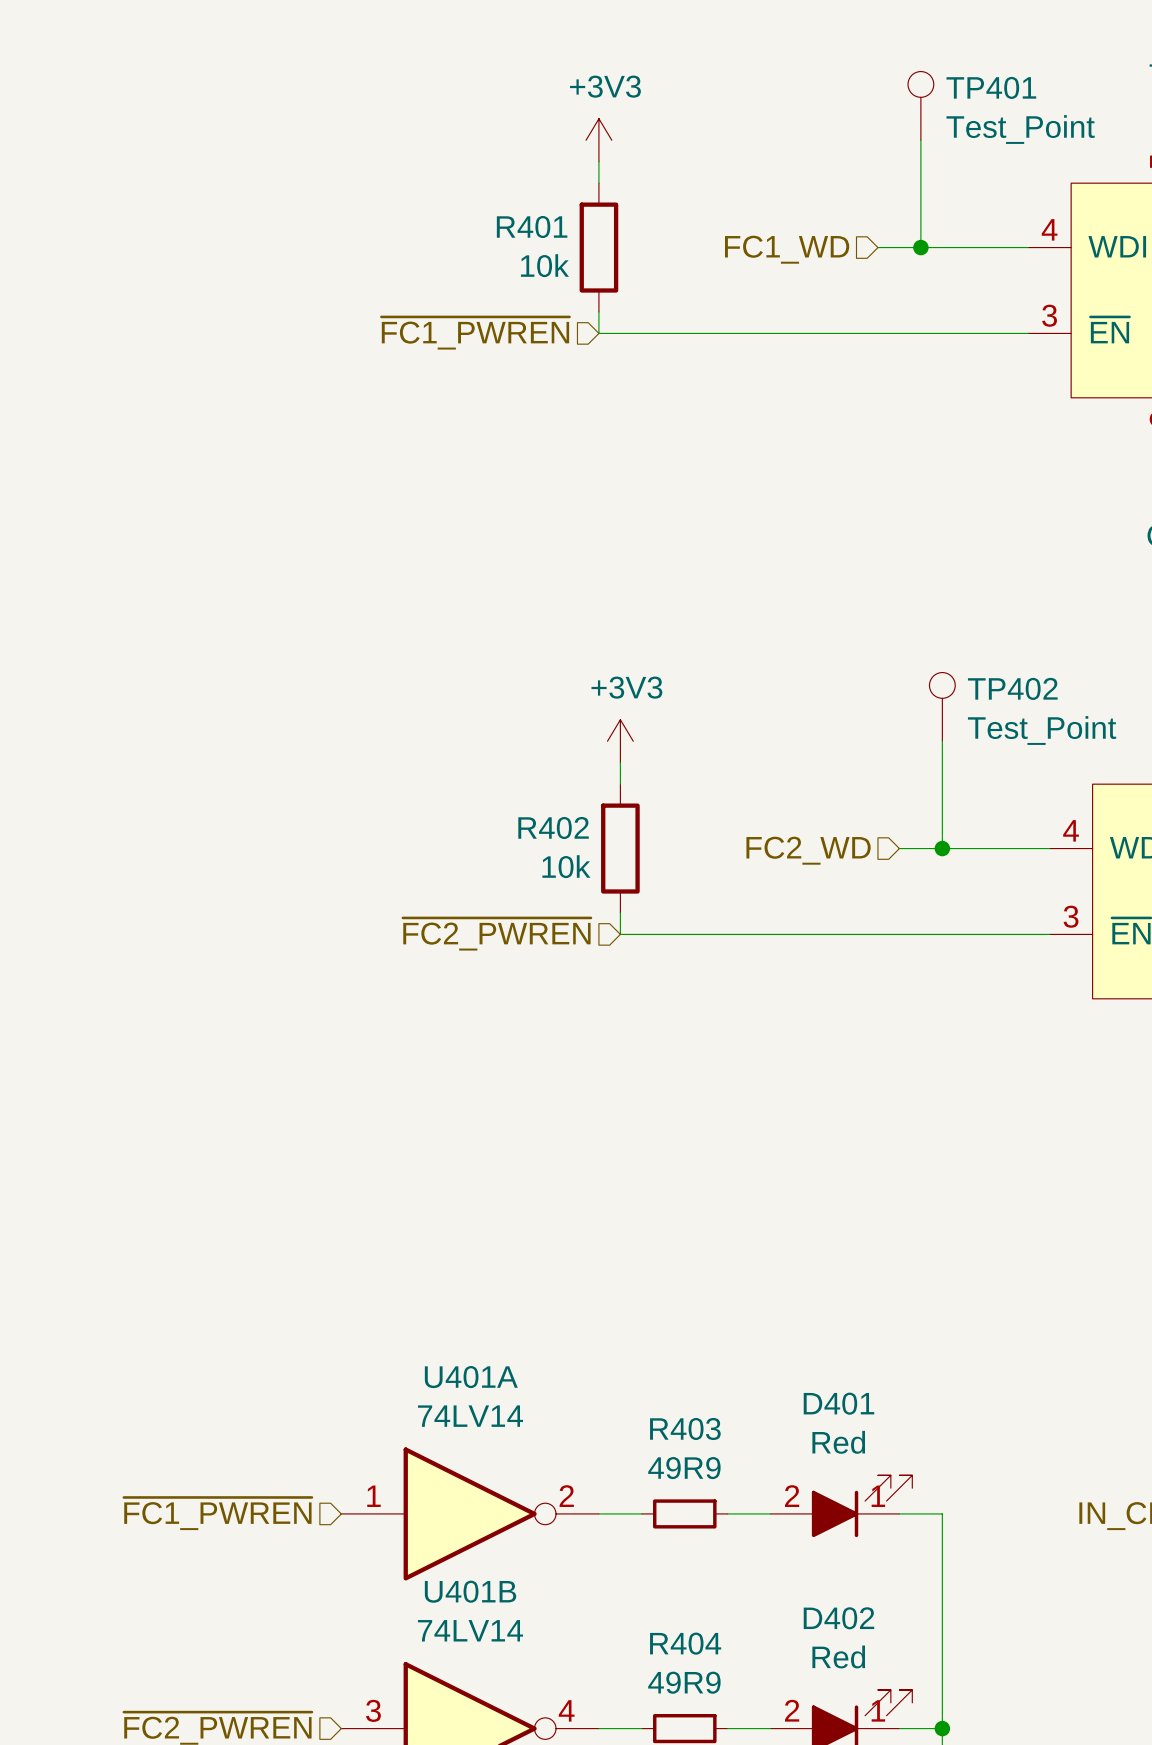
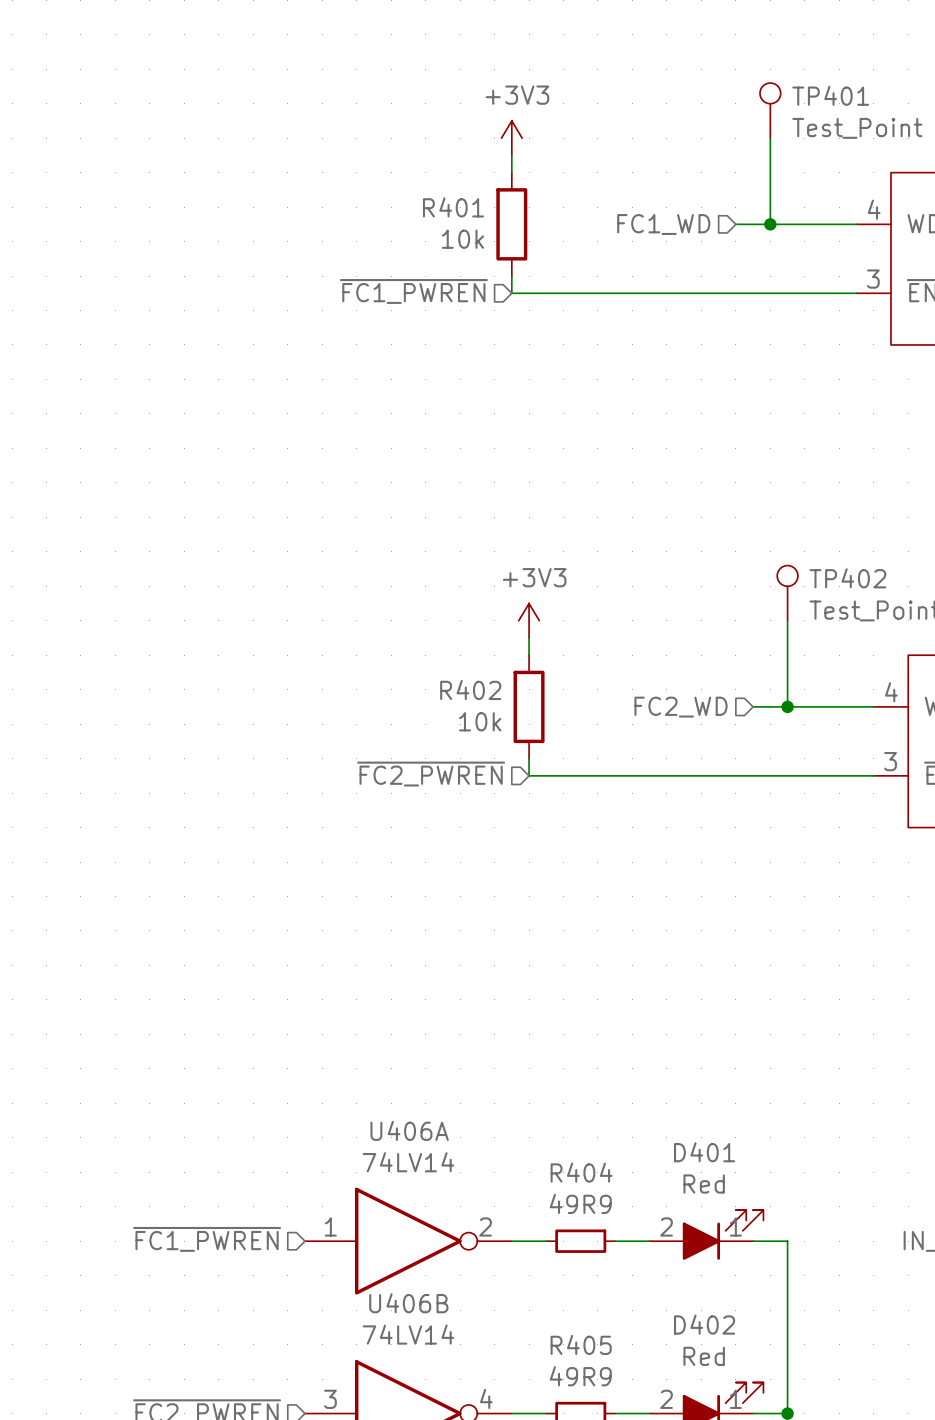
U401A name: U401A (471, 1377) -> U406A (409, 1130)
R403 name: R403 (685, 1429) -> R404 (581, 1172)
U401B name: U401B (470, 1591) -> U406B (408, 1303)
R404 name: R404 (685, 1643) -> R405 (581, 1344)

